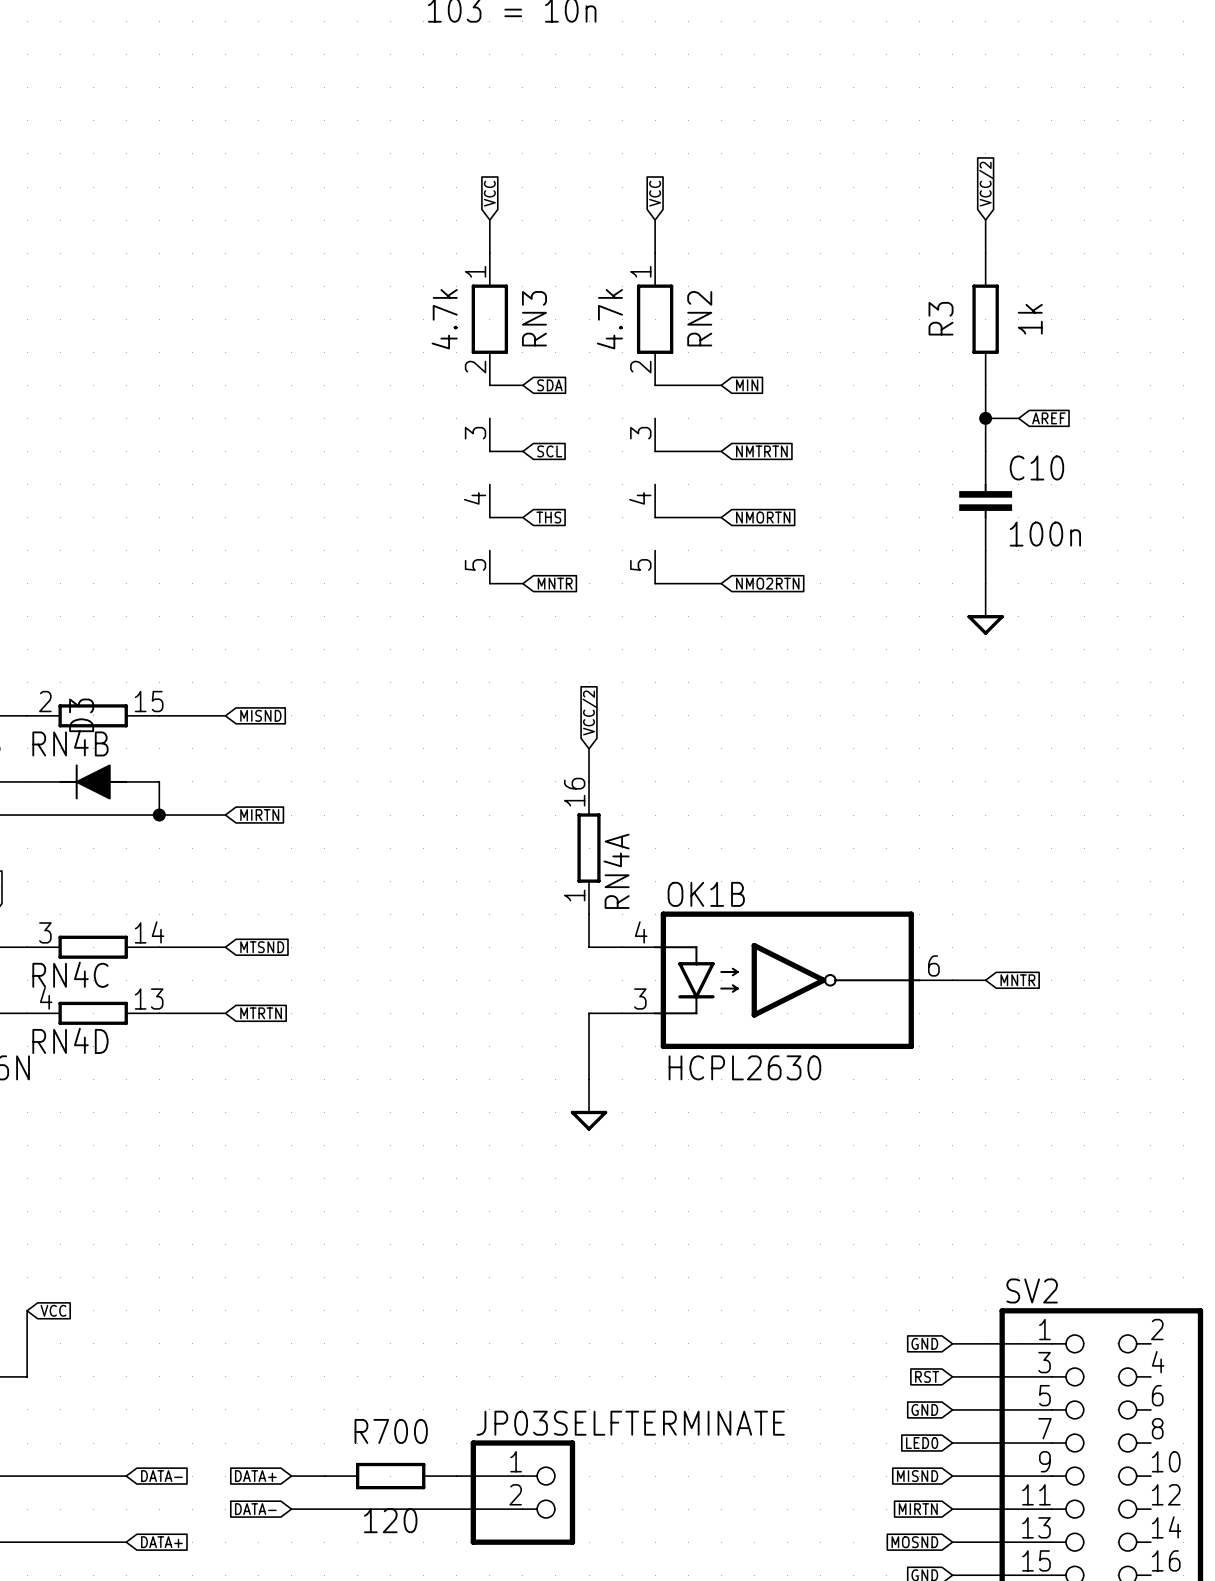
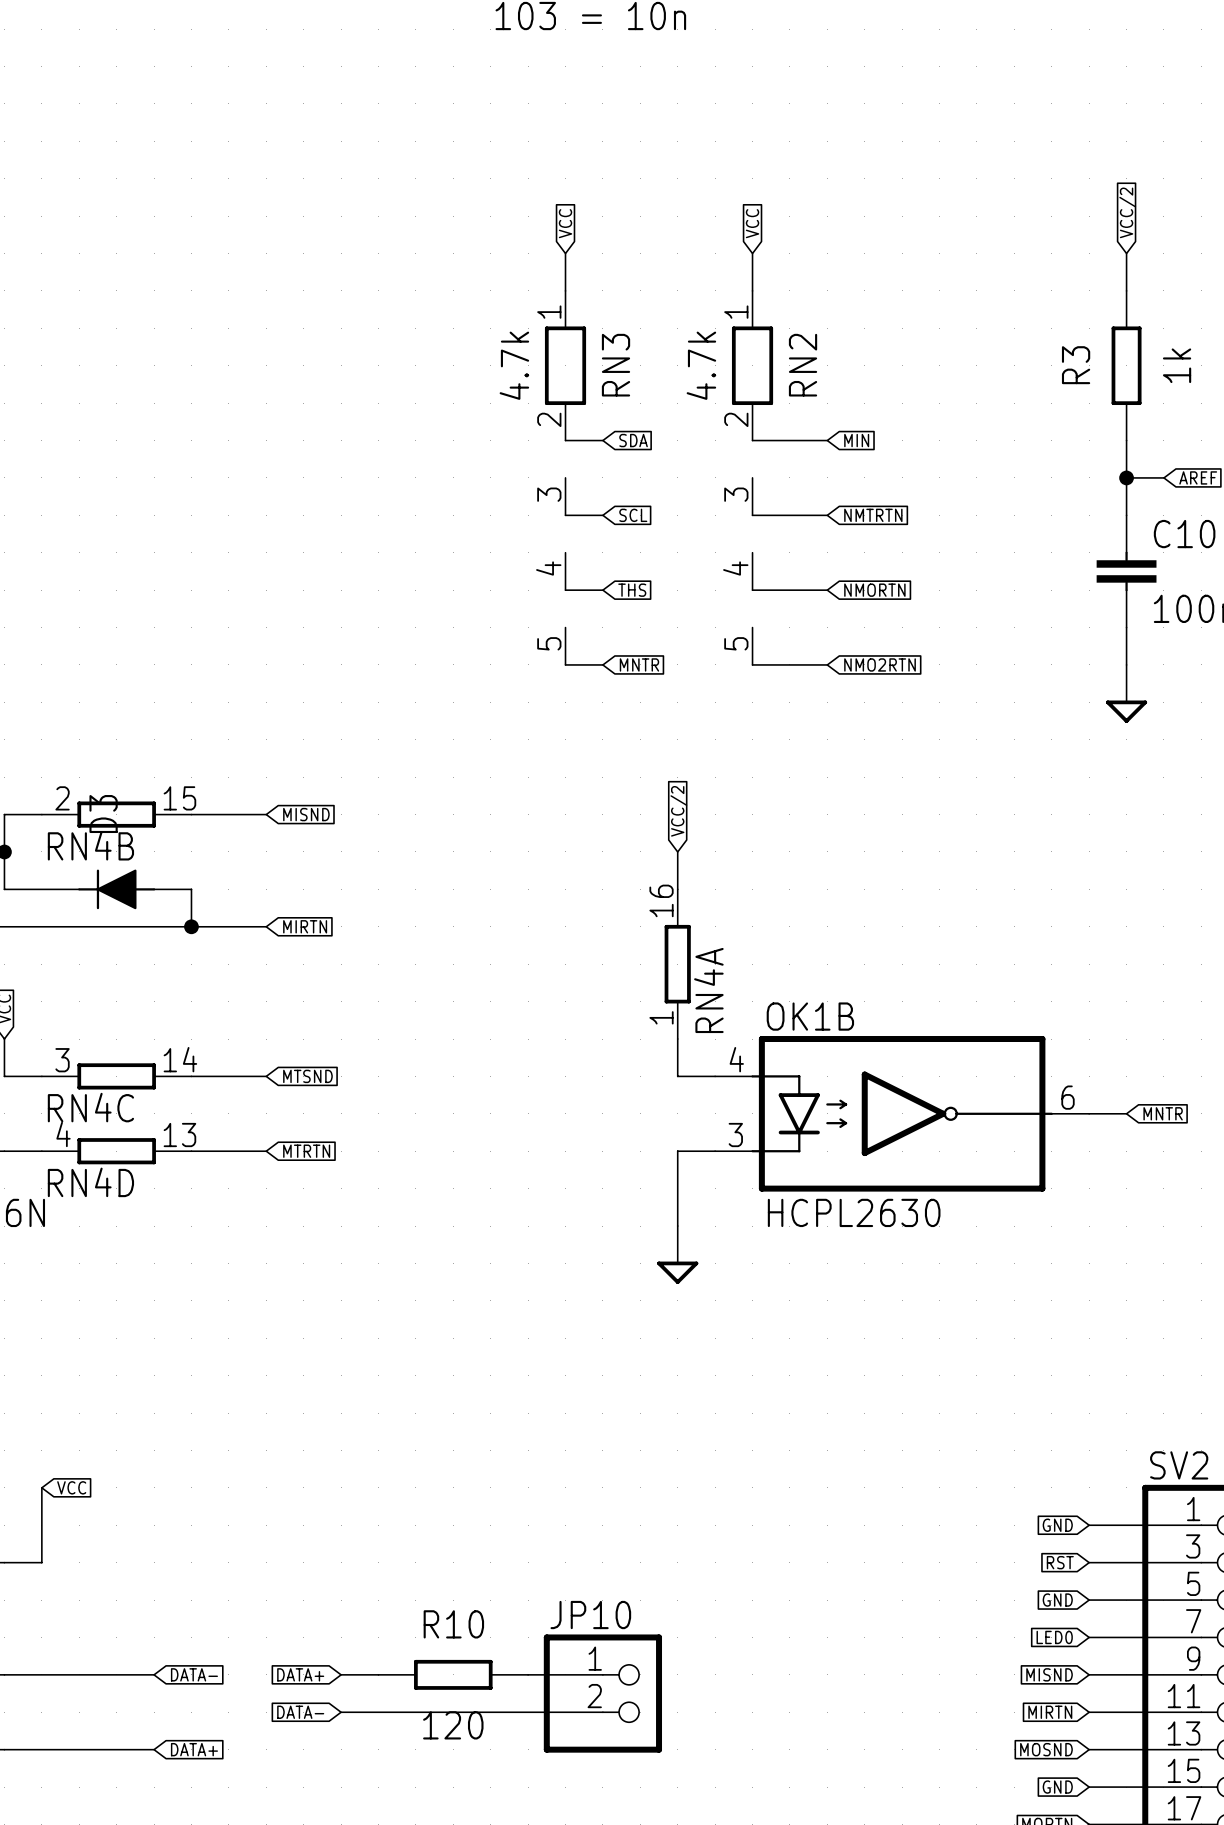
JP03SELFTERMINATE name: JP03SELFTERMINATE (630, 1423) -> JP10 (590, 1615)
R700 name: R700 (391, 1431) -> R10 (453, 1624)

